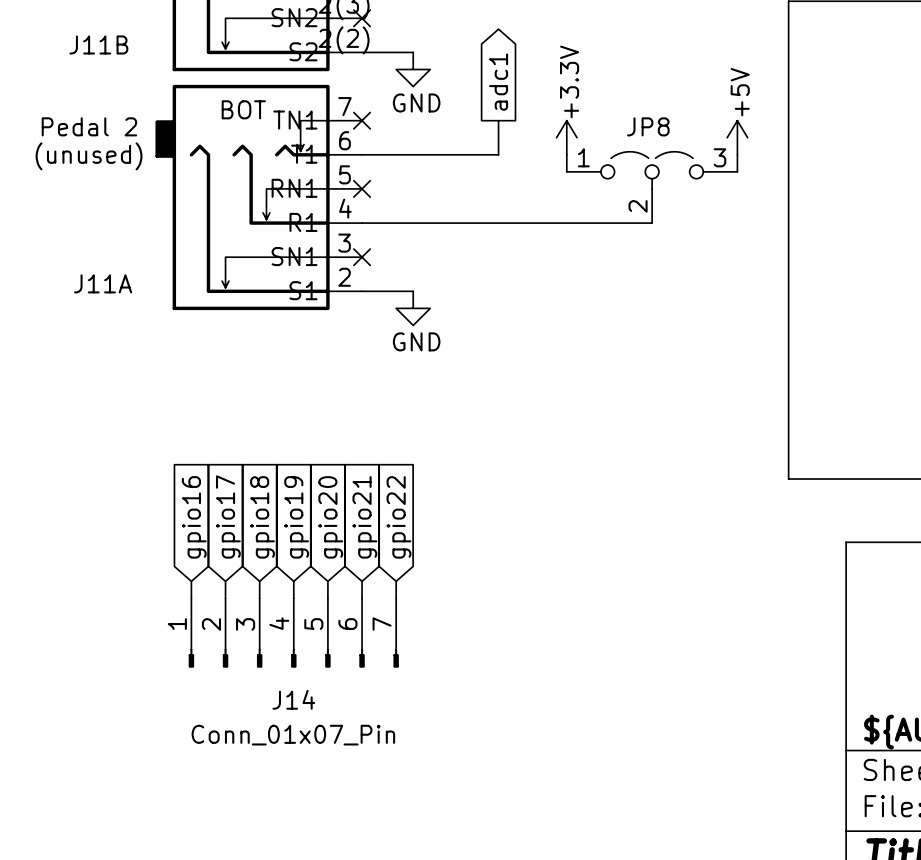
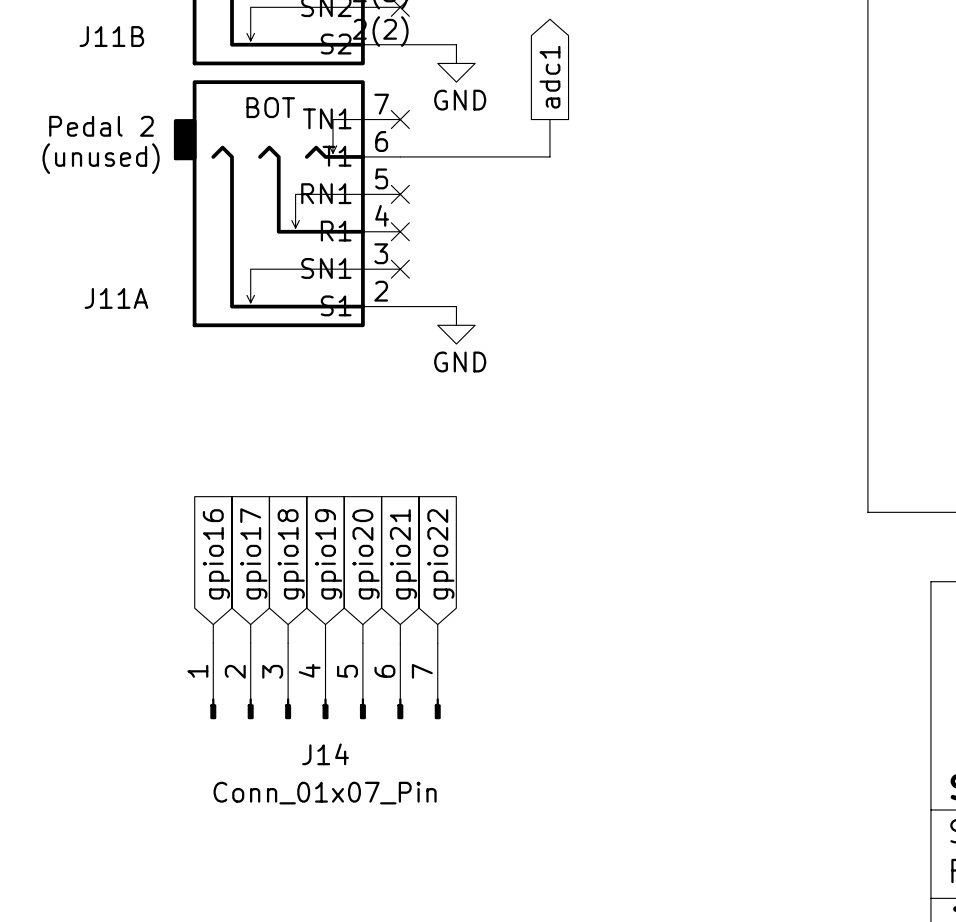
power symbol: +3.3V (566, 137) -> none
power symbol: +5V (737, 137) -> none
wire: (566, 154) (566, 171) -> none
wire: (737, 154) (737, 171) -> none
JP8: (652, 187) -> none
wire: (362, 223) (652, 223) -> none
no-connect mark: none -> (400, 231)

